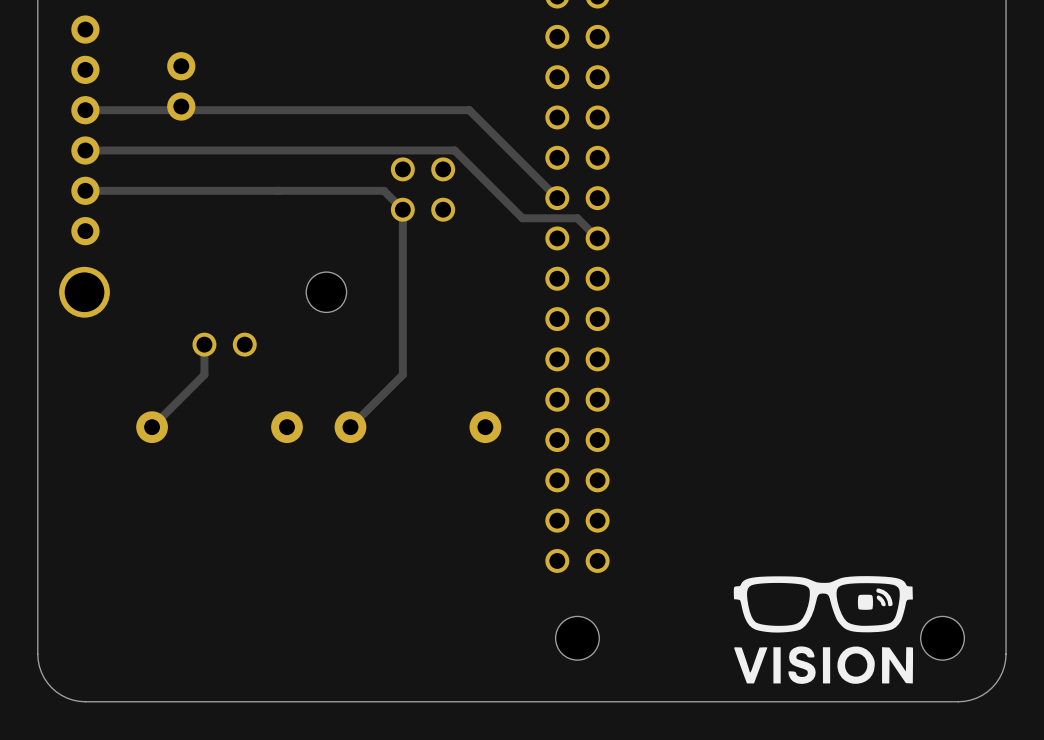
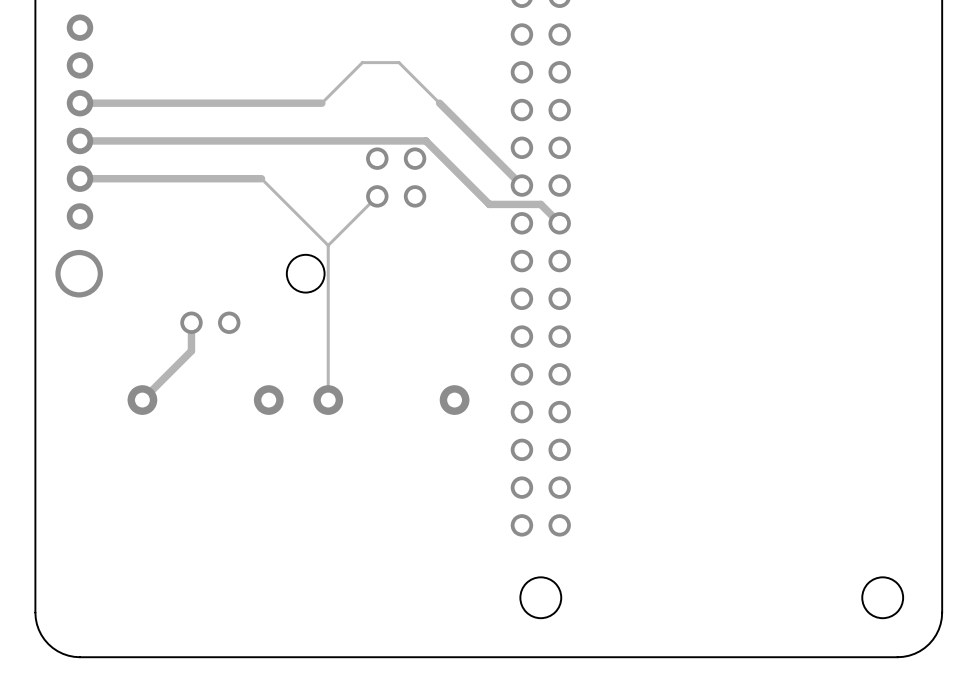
part: (181, 66) -> none
part: (181, 106) -> none
track: (469, 110) (343, 110) -> (439, 103) (398, 62) (362, 62) (321, 103)
track: (279, 190) (383, 190) (402, 209) (402, 374) (350, 427) -> (328, 245) (328, 400)
track: none -> (261, 178) (328, 245)
track: none -> (377, 196) (328, 245)
drawing: [733, 576, 914, 684] -> none

